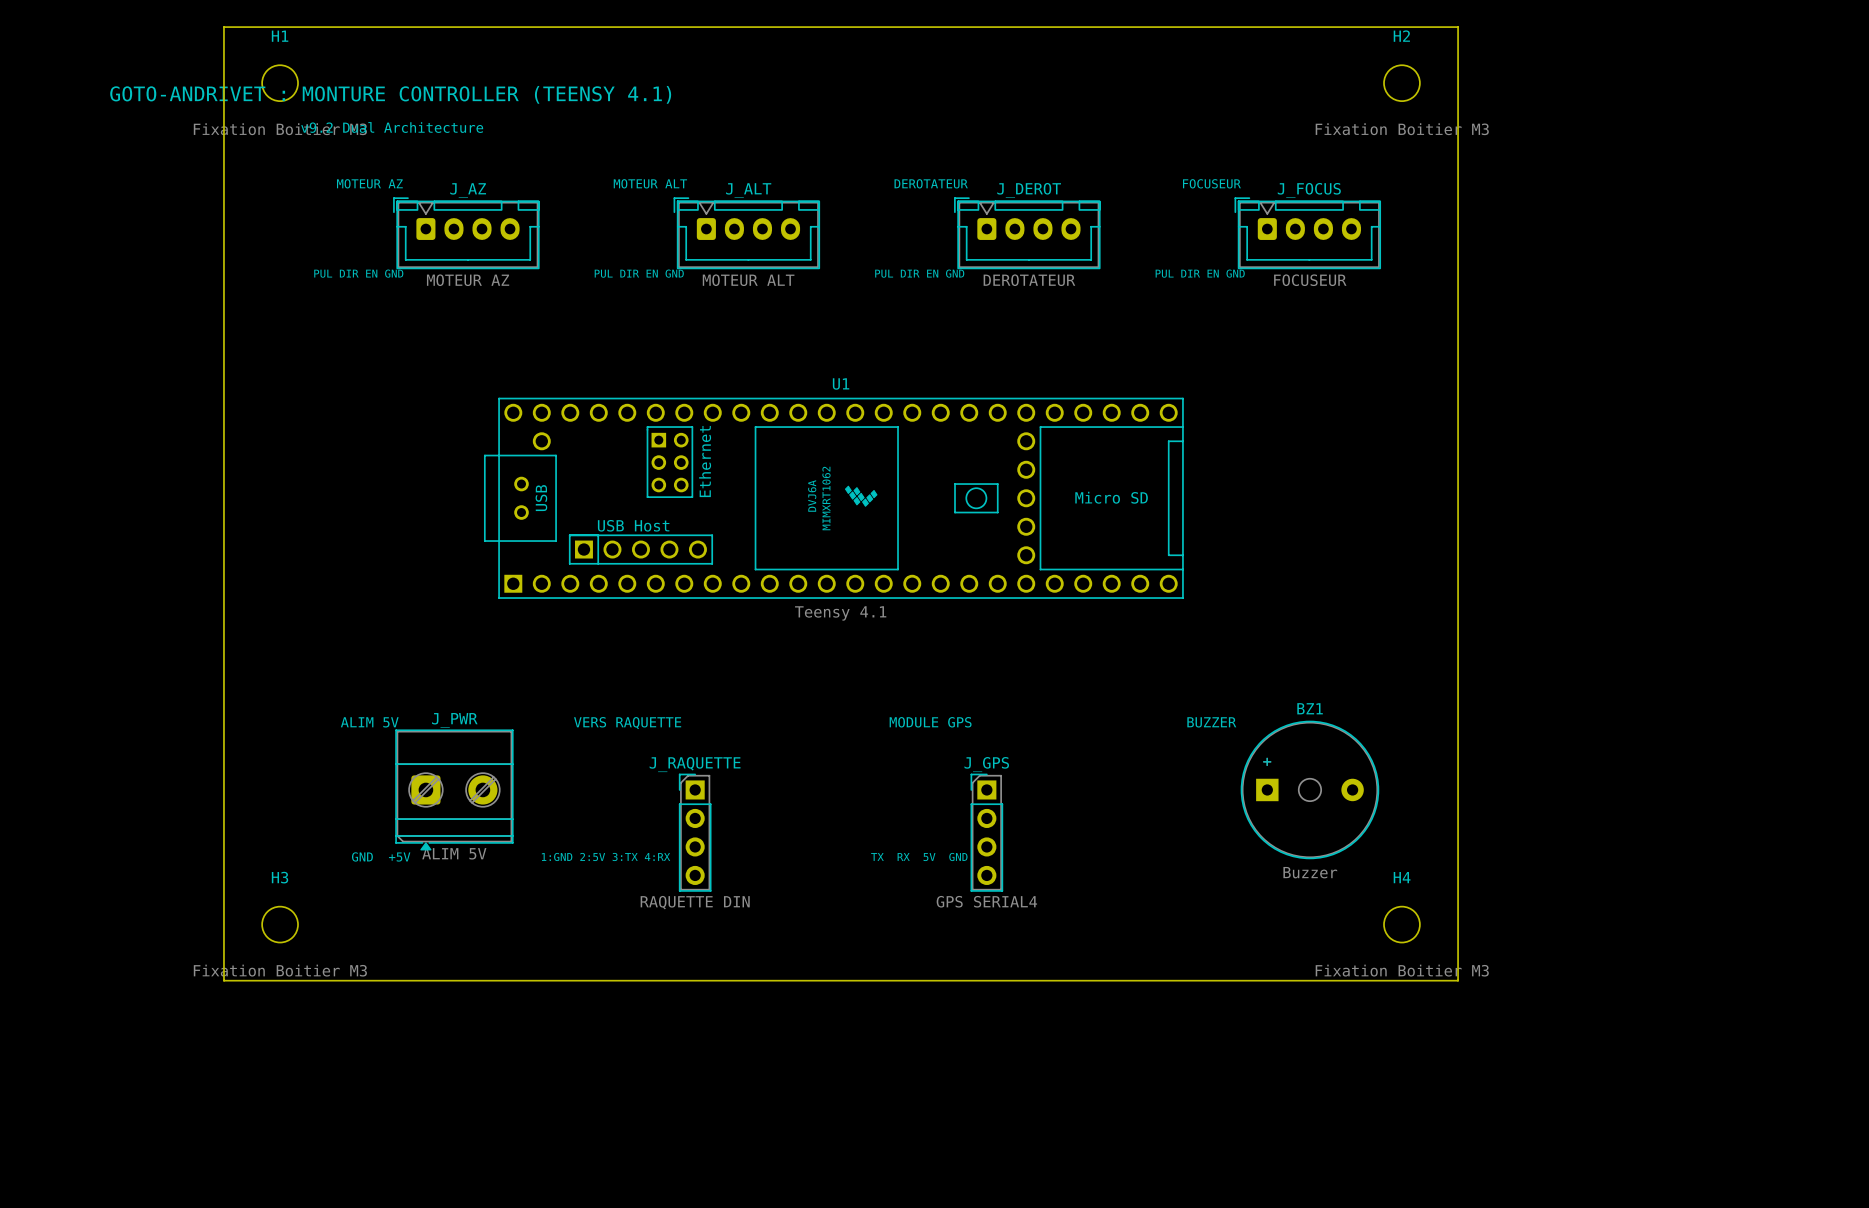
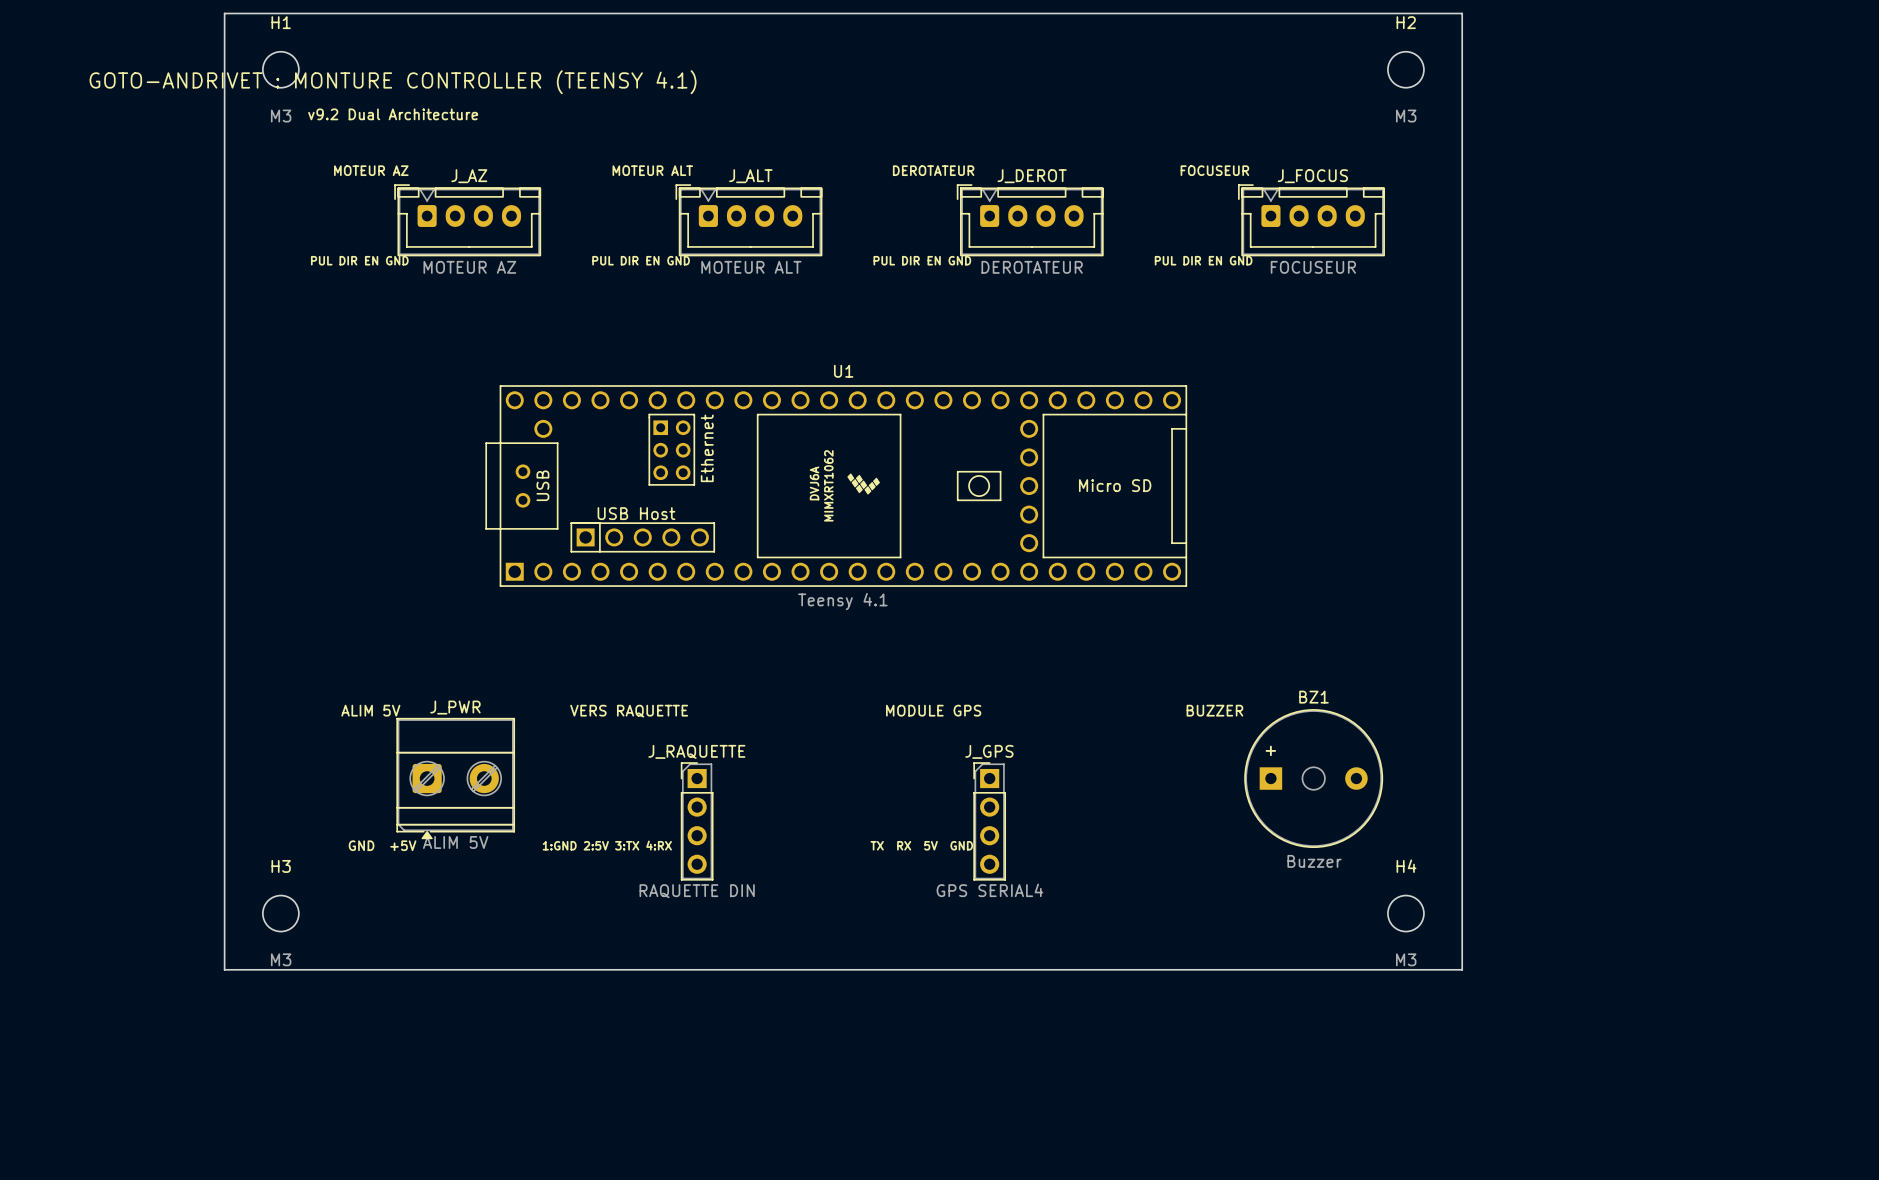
H1 value: Fixation Boitier M3 (280, 129) -> M3 (281, 116)
H2 value: Fixation Boitier M3 (1402, 129) -> M3 (1406, 116)
H3 value: Fixation Boitier M3 (280, 970) -> M3 (281, 959)
H4 value: Fixation Boitier M3 (1402, 970) -> M3 (1406, 959)

